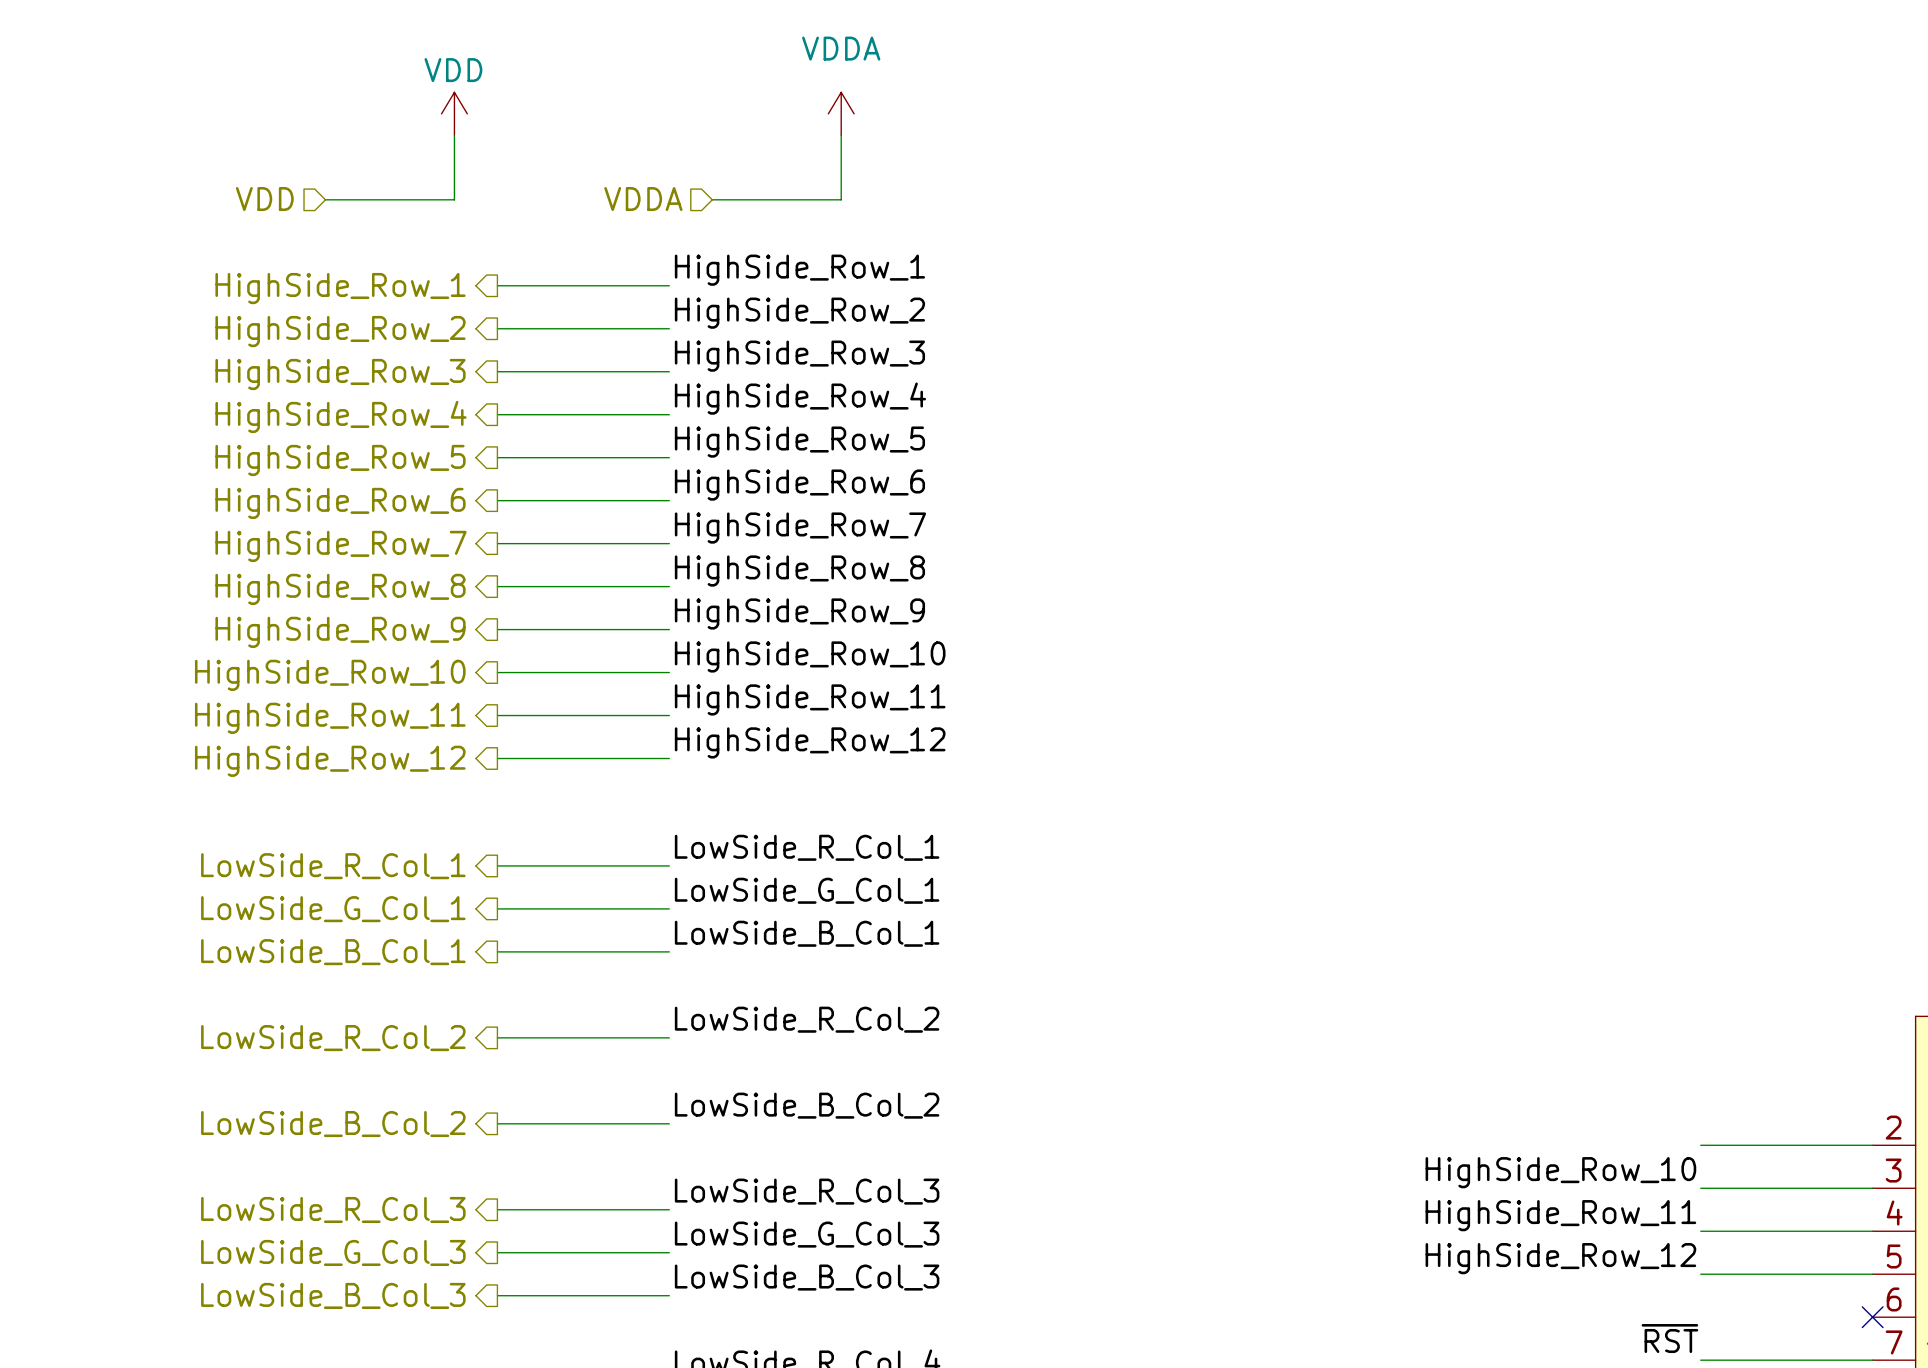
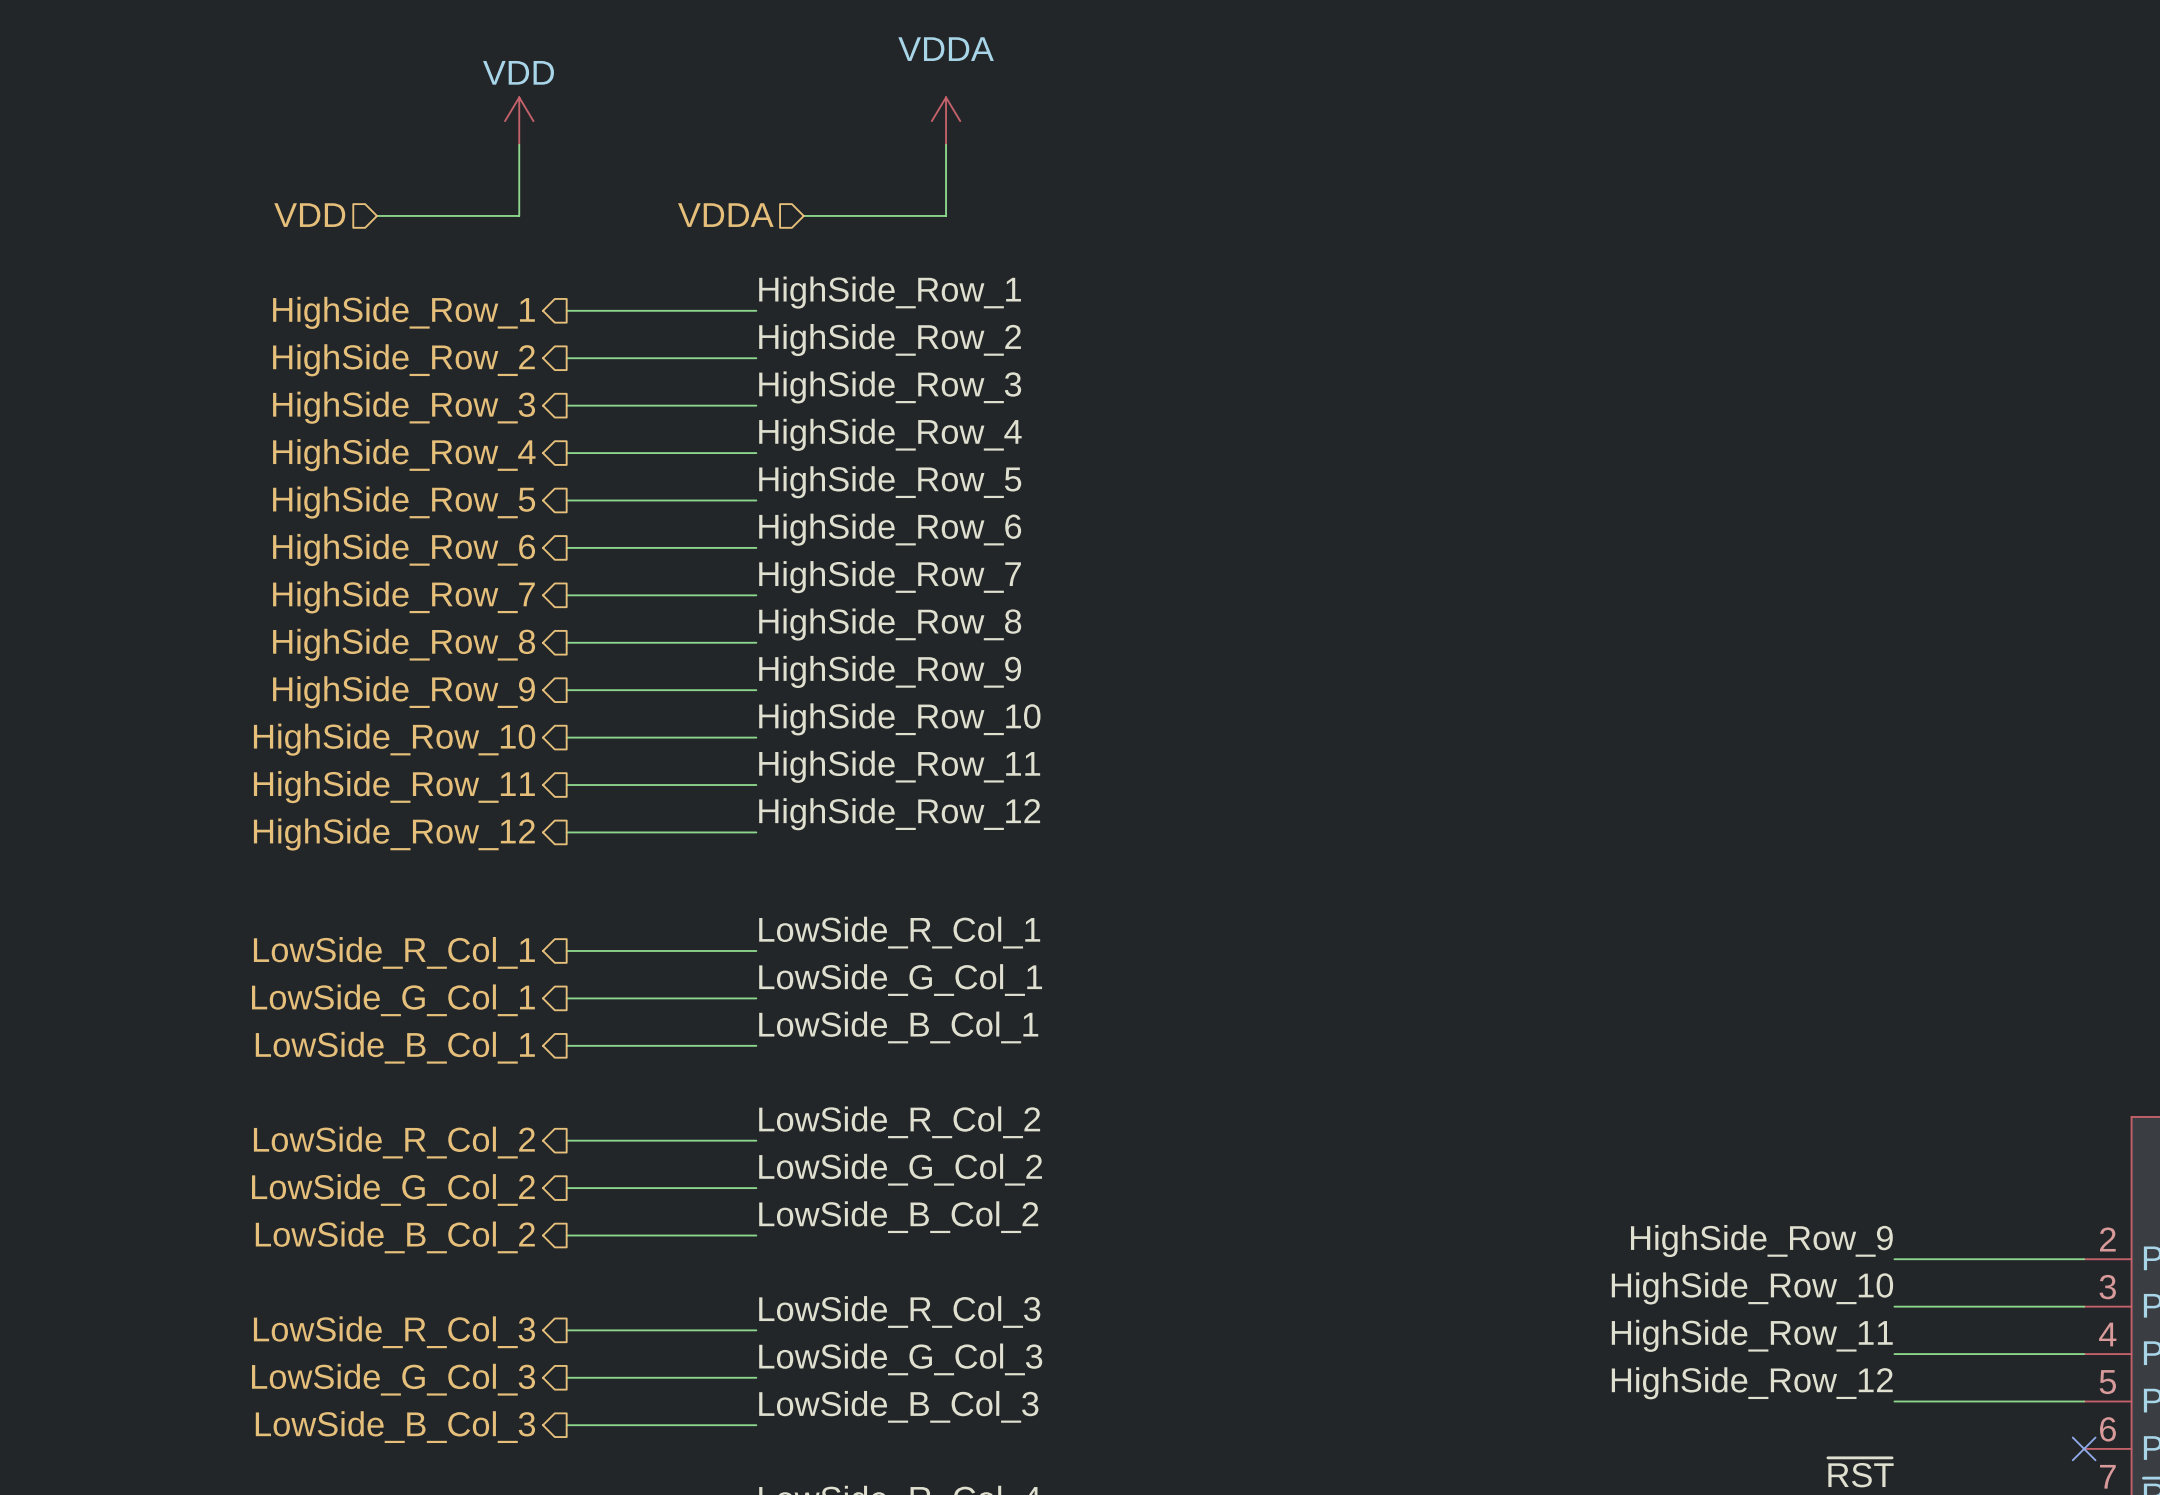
label: none -> LowSide_G_Col_2 (900, 1169)
wire: none -> (566, 1188) (756, 1188)
hierarchical label: none -> LowSide_G_Col_2 (393, 1190)
label: none -> HighSide_Row_9 (1761, 1241)

